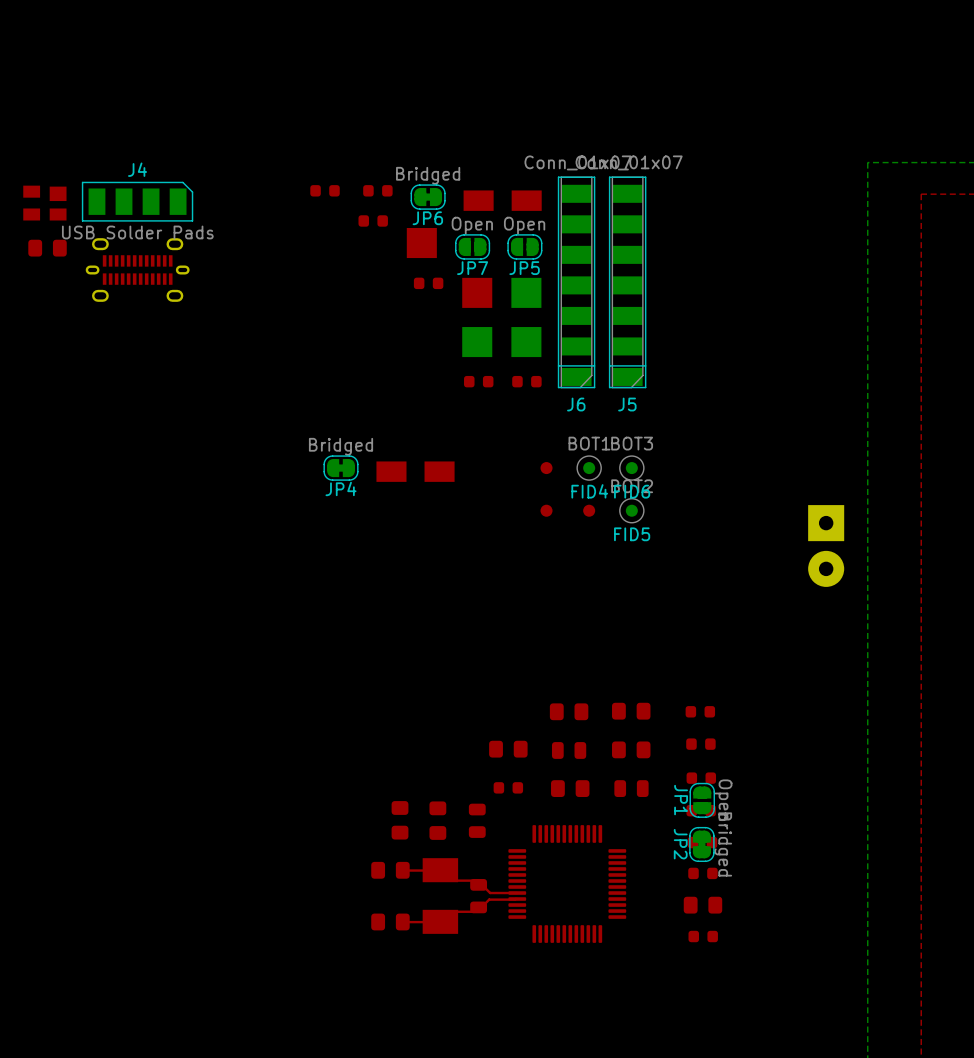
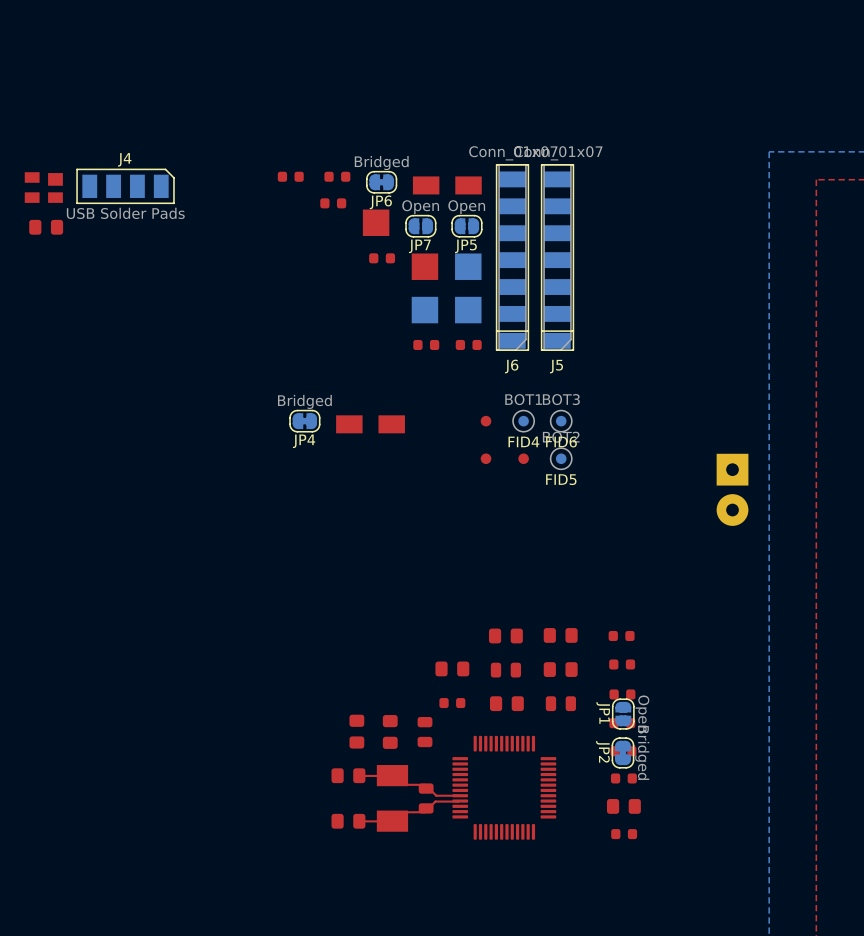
part: (137, 270) -> none

